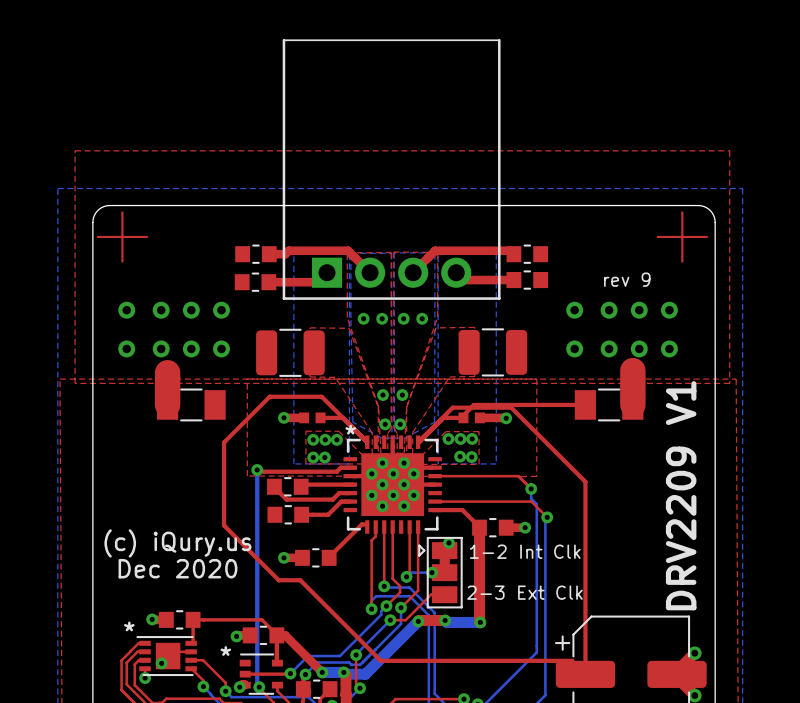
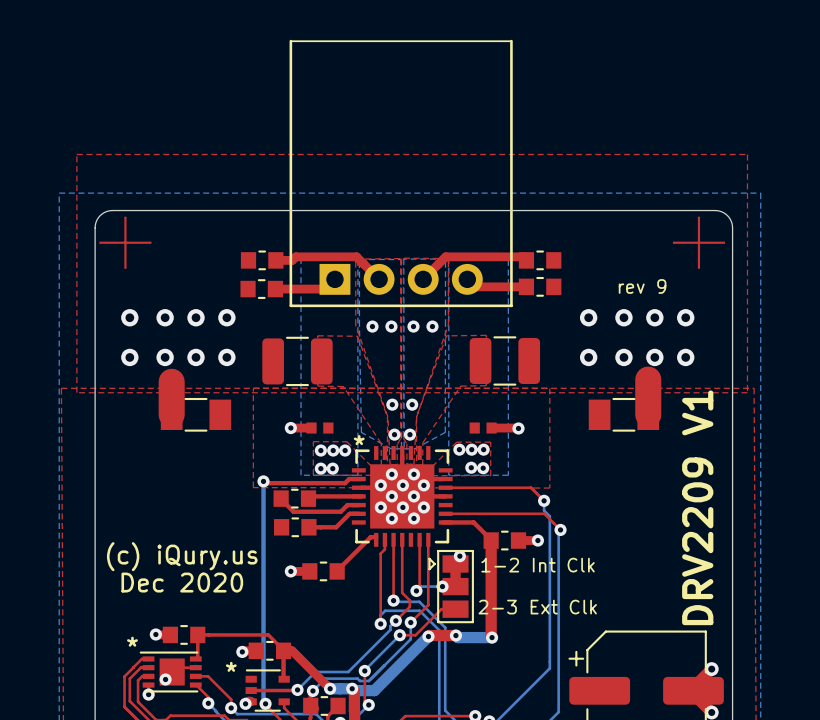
top track: (585, 404) (473, 404) (463, 415) -> none
top track: (320, 417) (342, 417) -> none
top track: (463, 417) (443, 417) (418, 442) (452, 407) (511, 407) (585, 481) (585, 674) (571, 660) (380, 660) (300, 580) (278, 580) (224, 525) (224, 442) (269, 396) (321, 396) (367, 442) -> none

